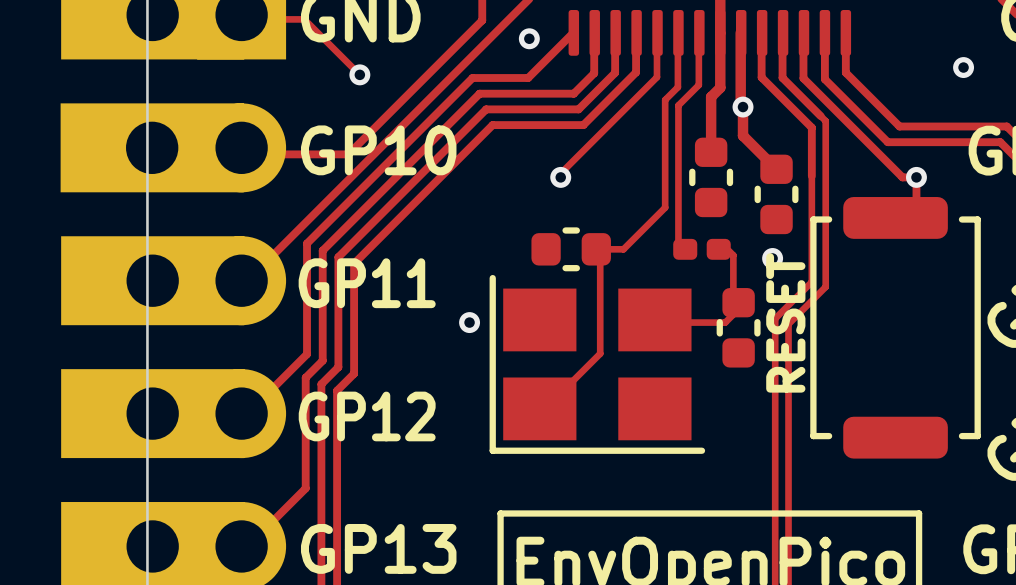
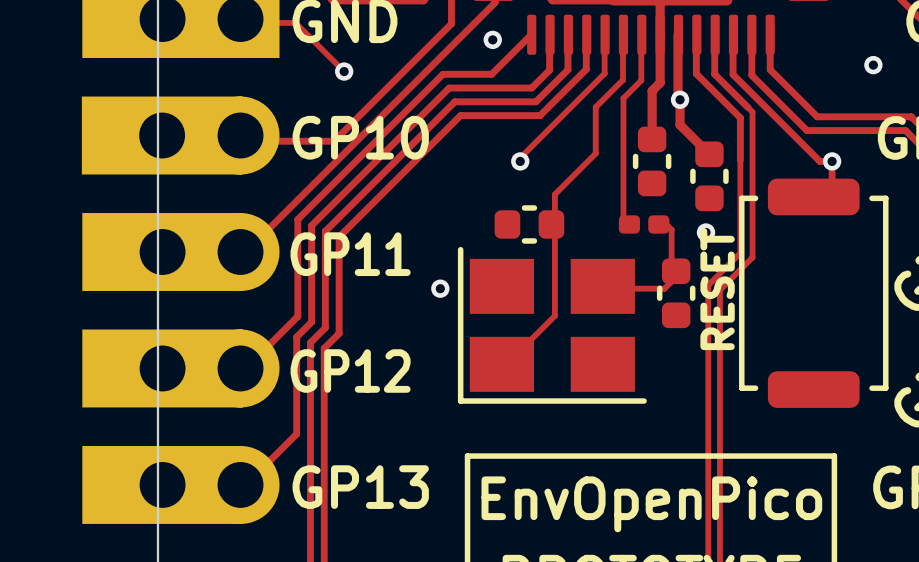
track: (677, 84) (677, 87) (665, 99) (665, 207) (623, 249) (596, 249) (600, 253) -> (622, 79) (595, 107) (595, 153) (554, 194) (554, 227)

